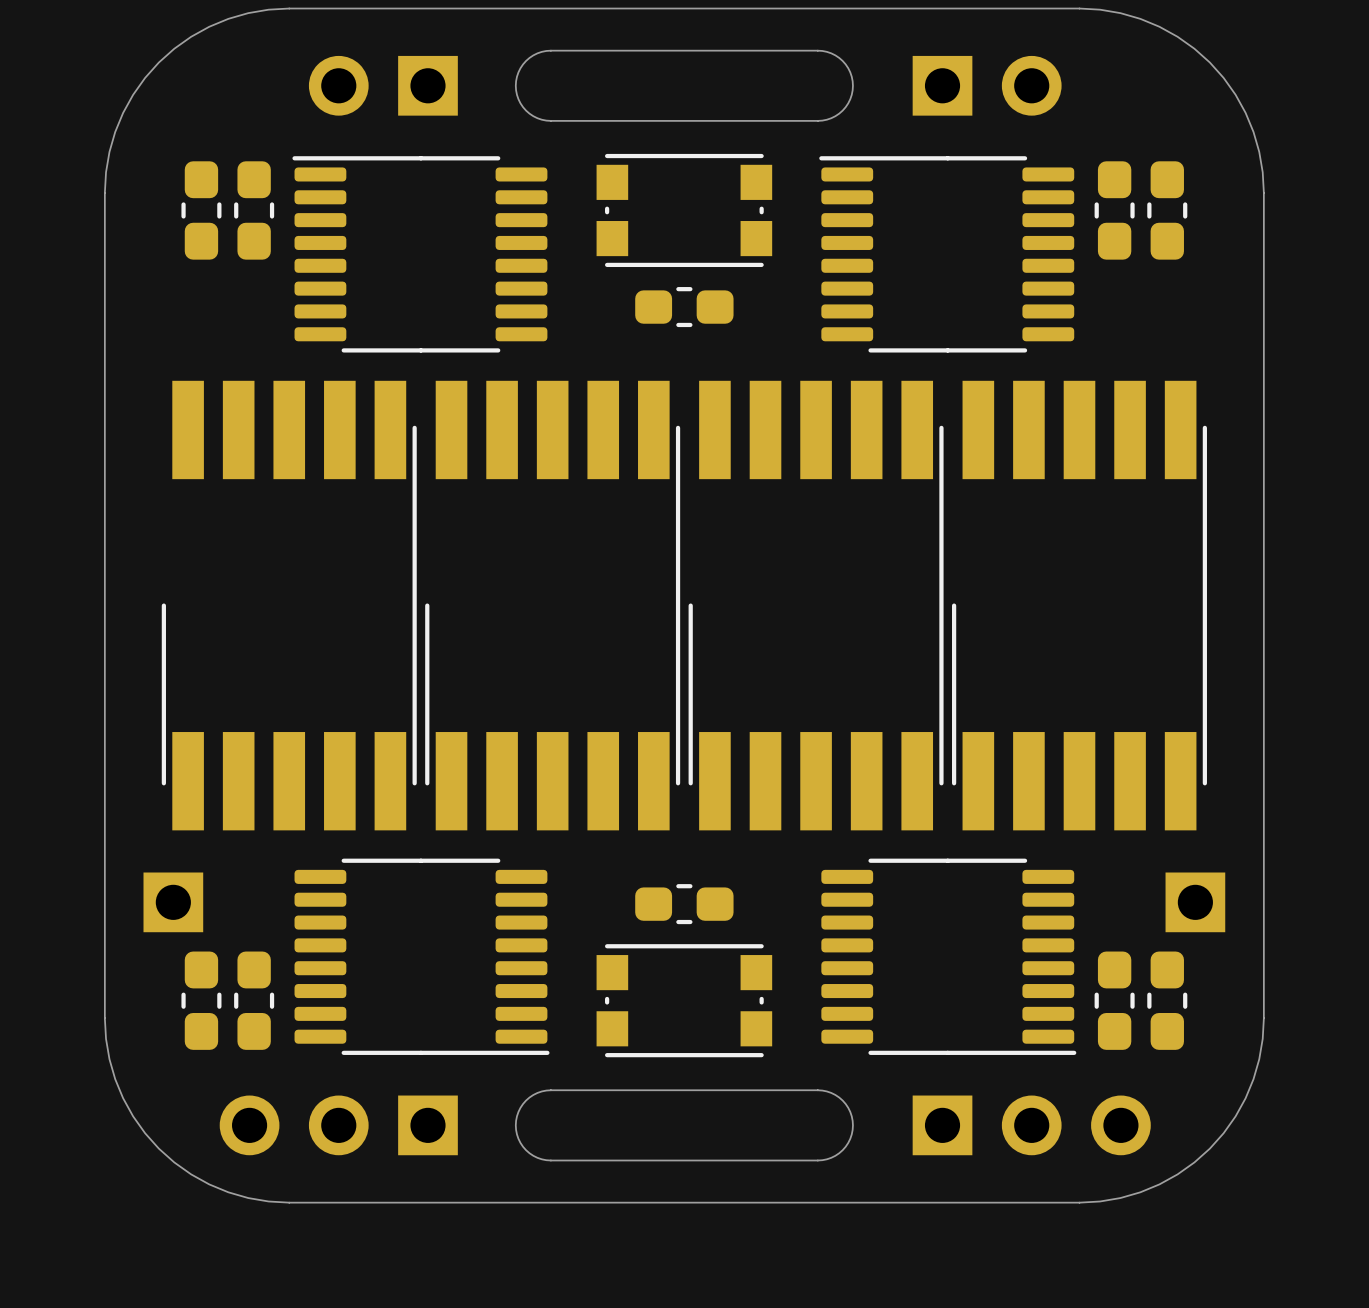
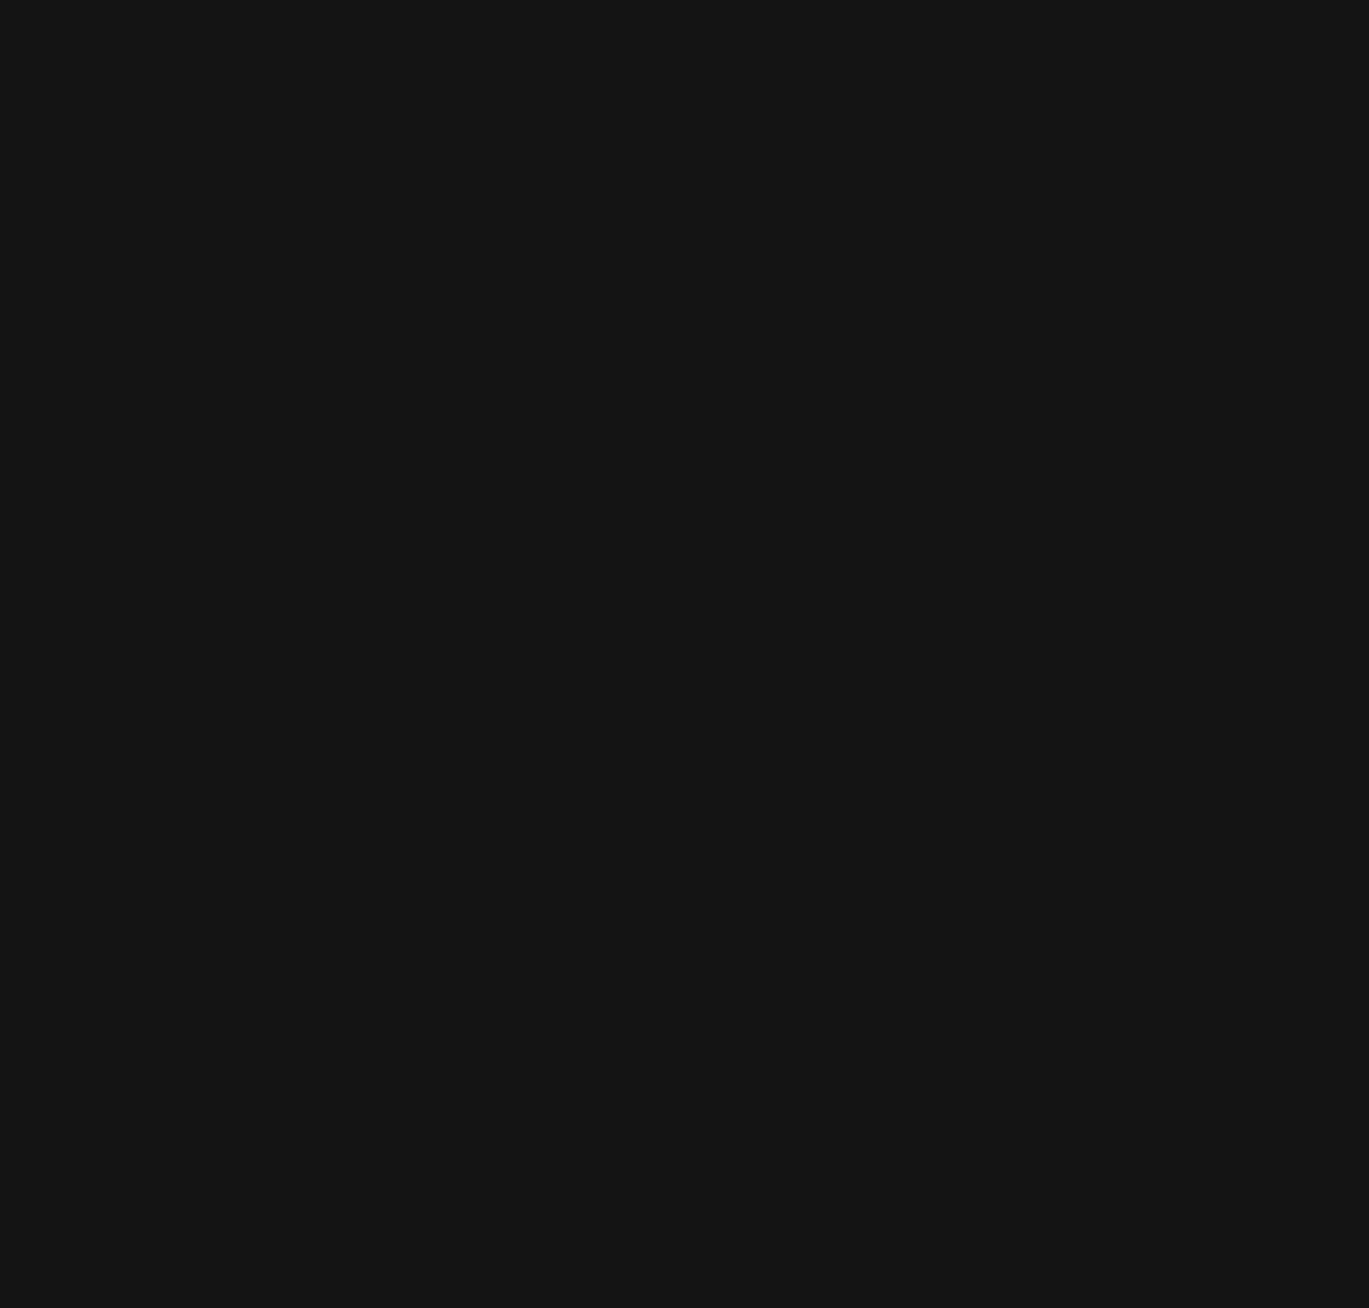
board edge: (289, 8) (1100, 9) (1140, 18) (1177, 36) (1194, 48) (1223, 77) (1235, 94) (1253, 132) (1262, 172) (1263, 192) (1263, 1018) (1259, 1059) (1245, 1098) (1223, 1133) (1194, 1162) (1159, 1184) (1140, 1192) (1120, 1198) (1079, 1202) (289, 1202) (248, 1198) (209, 1184) (174, 1162) (145, 1133) (133, 1116) (115, 1079) (106, 1038) (104, 1018) (106, 172) (115, 132) (133, 94) (158, 62) (174, 48) (209, 26) (228, 18) (248, 13) (289, 8) -> none
board edge: (550, 50) (822, 50) (835, 55) (845, 64) (851, 76) (852, 90) (848, 103) (842, 110) (831, 118) (822, 120) (546, 120) (533, 116) (523, 107) (516, 94) (516, 81) (520, 68) (526, 60) (537, 53) (550, 50) -> none
part: (383, 85) -> none
part: (987, 85) -> none
part: (201, 210) -> none
part: (254, 210) -> none
part: (684, 210) -> none
part: (1114, 210) -> none
part: (1167, 210) -> none
part: (419, 254) -> none
part: (946, 254) -> none
part: (684, 307) -> none
part: (289, 605) -> none
part: (552, 605) -> none
part: (816, 605) -> none
part: (1079, 605) -> none
part: (173, 902) -> none
part: (1195, 902) -> none
part: (684, 904) -> none
part: (422, 956) -> none
part: (948, 956) -> none
part: (201, 1000) -> none
part: (254, 1000) -> none
part: (684, 1000) -> none
part: (1114, 1000) -> none
part: (1167, 1000) -> none
board edge: (550, 1090) (822, 1090) (835, 1094) (845, 1104) (851, 1116) (852, 1129) (848, 1142) (842, 1150) (831, 1157) (822, 1160) (546, 1160) (533, 1155) (523, 1146) (516, 1134) (516, 1120) (520, 1107) (526, 1100) (537, 1092) (550, 1090) -> none
part: (338, 1125) -> none
part: (1031, 1125) -> none

